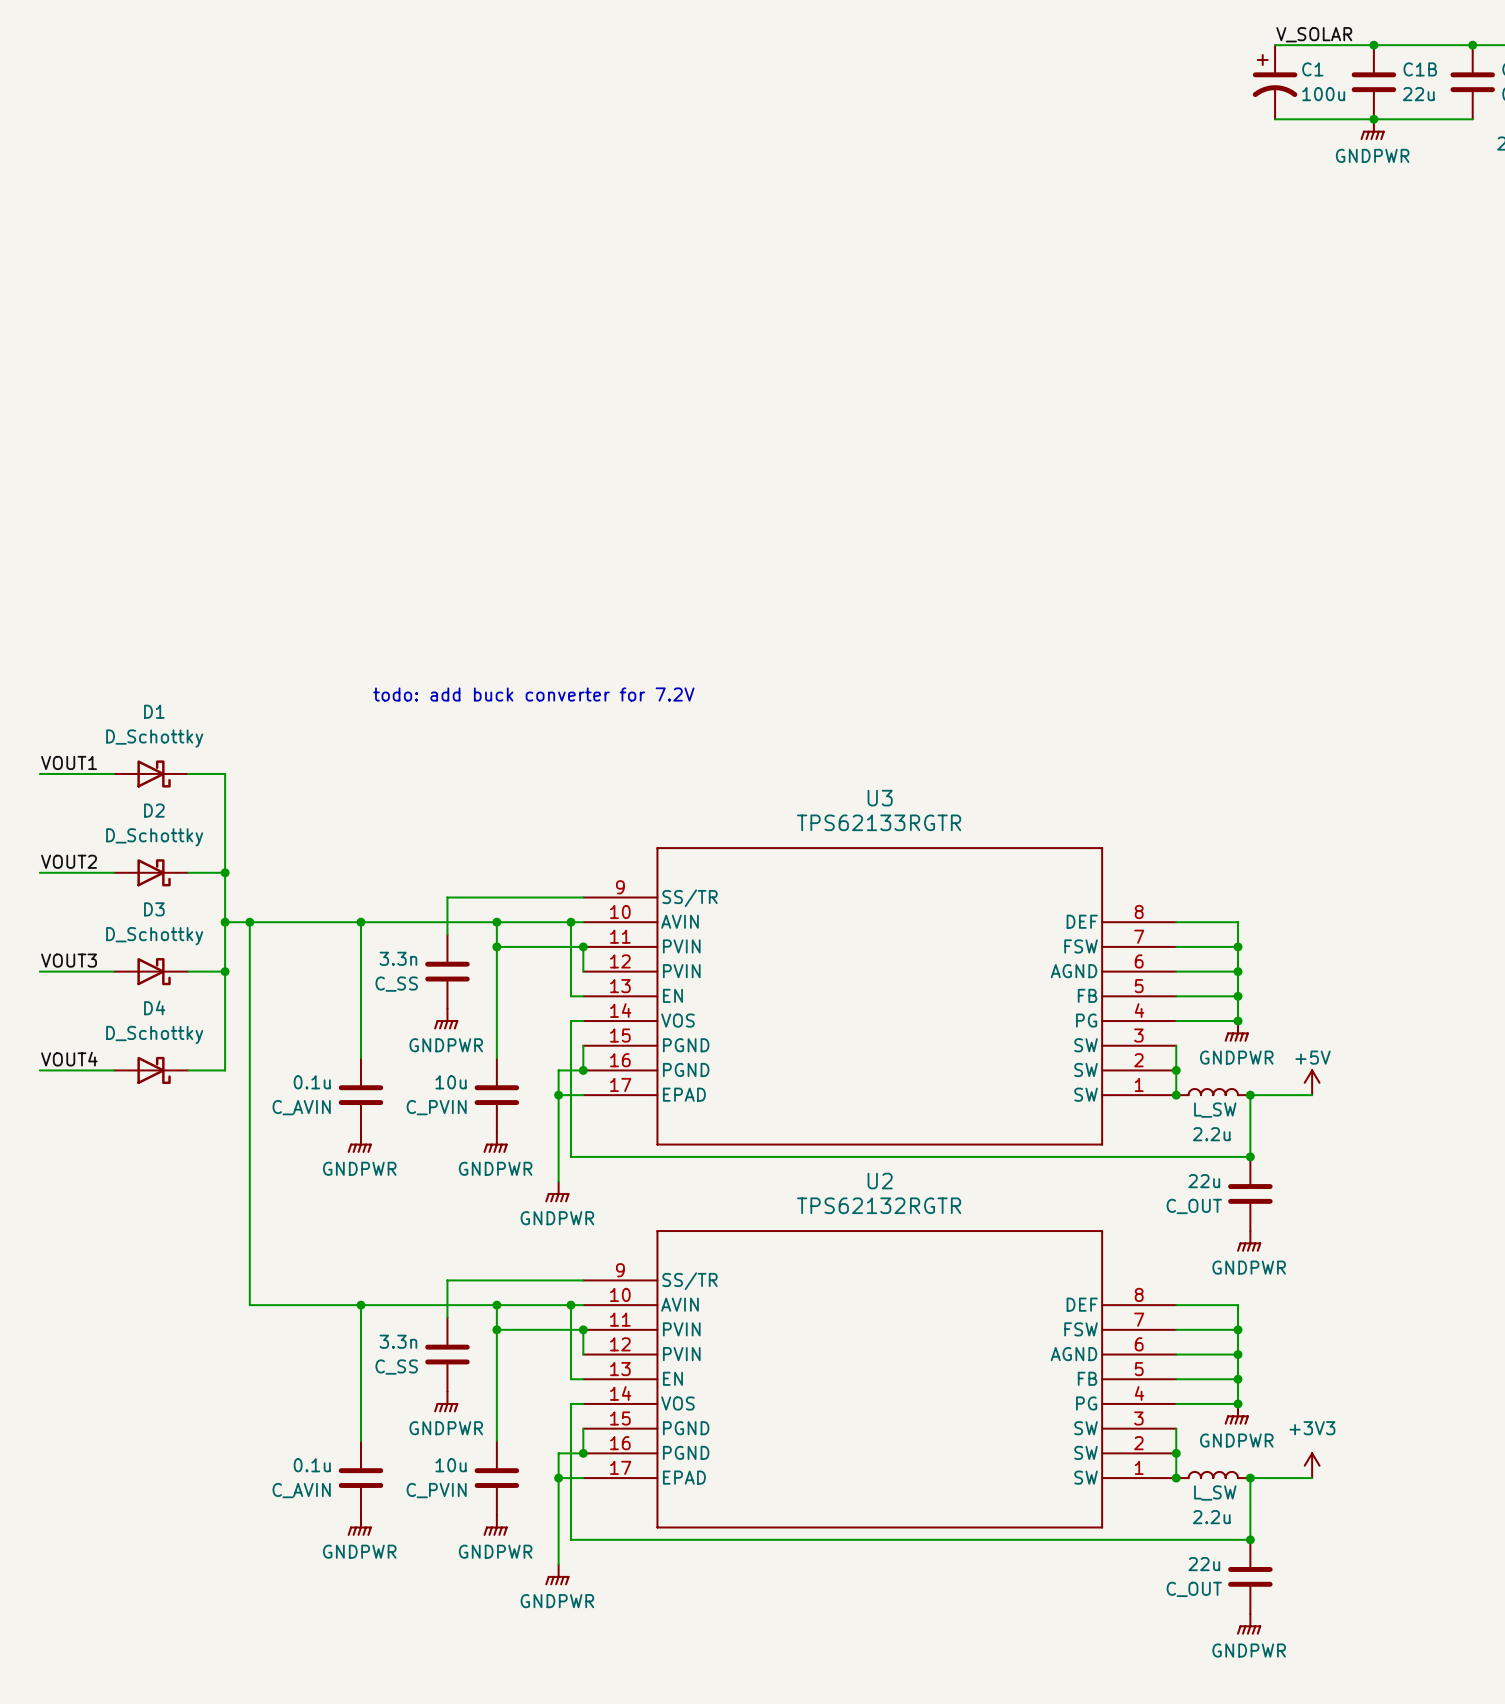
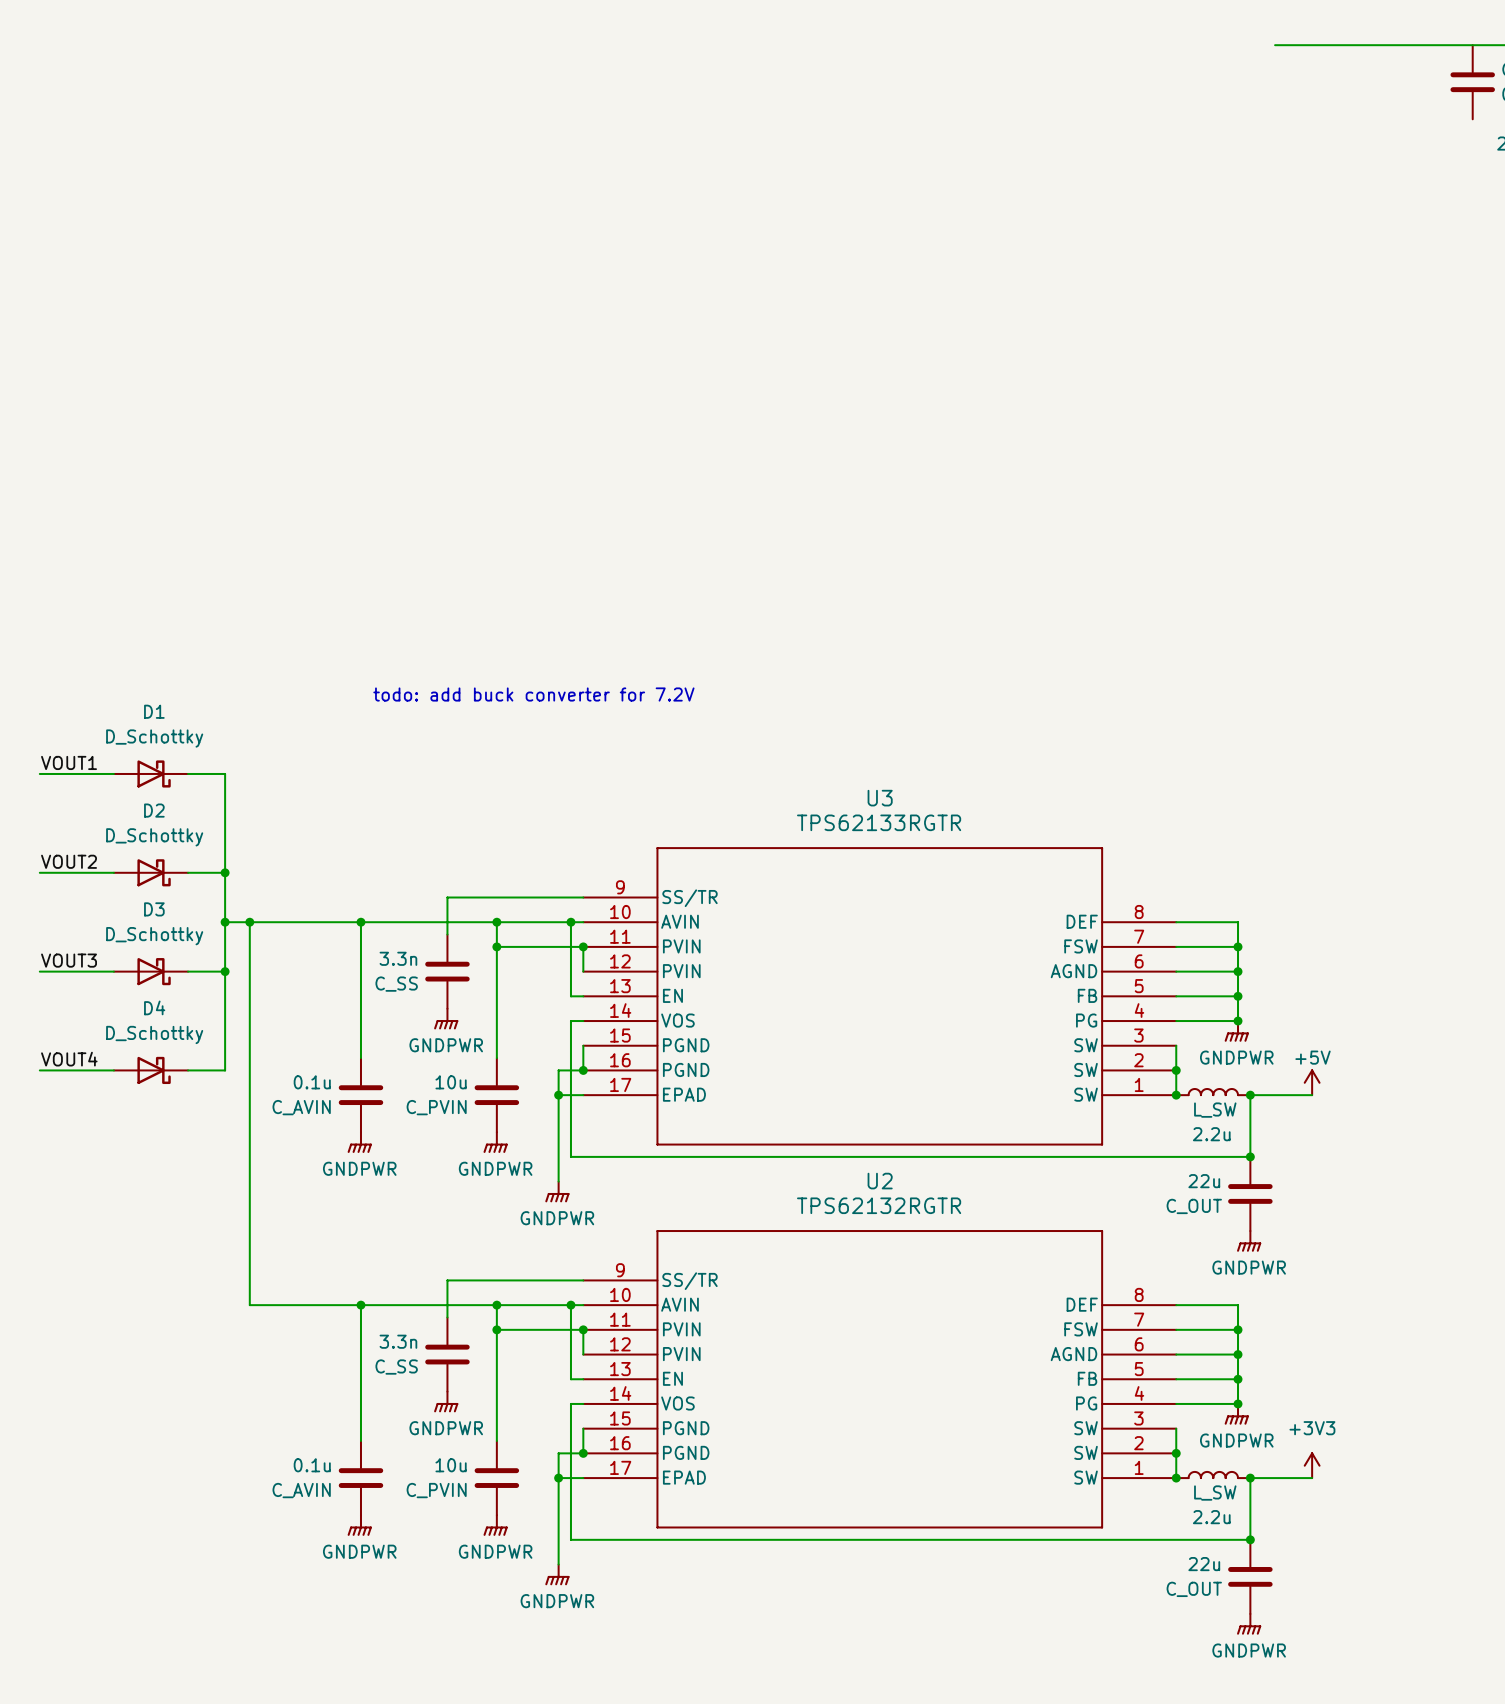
label: V_SOLAR (1314, 34) -> none
junction: (1373, 45) -> none
junction: (1472, 45) -> none
C1: 100u (1275, 82) -> none
C1B: 22u (1373, 82) -> none
wire: (1275, 119) (1472, 119) -> none
junction: (1373, 119) -> none
power symbol: GNDPWR (1372, 129) -> none

